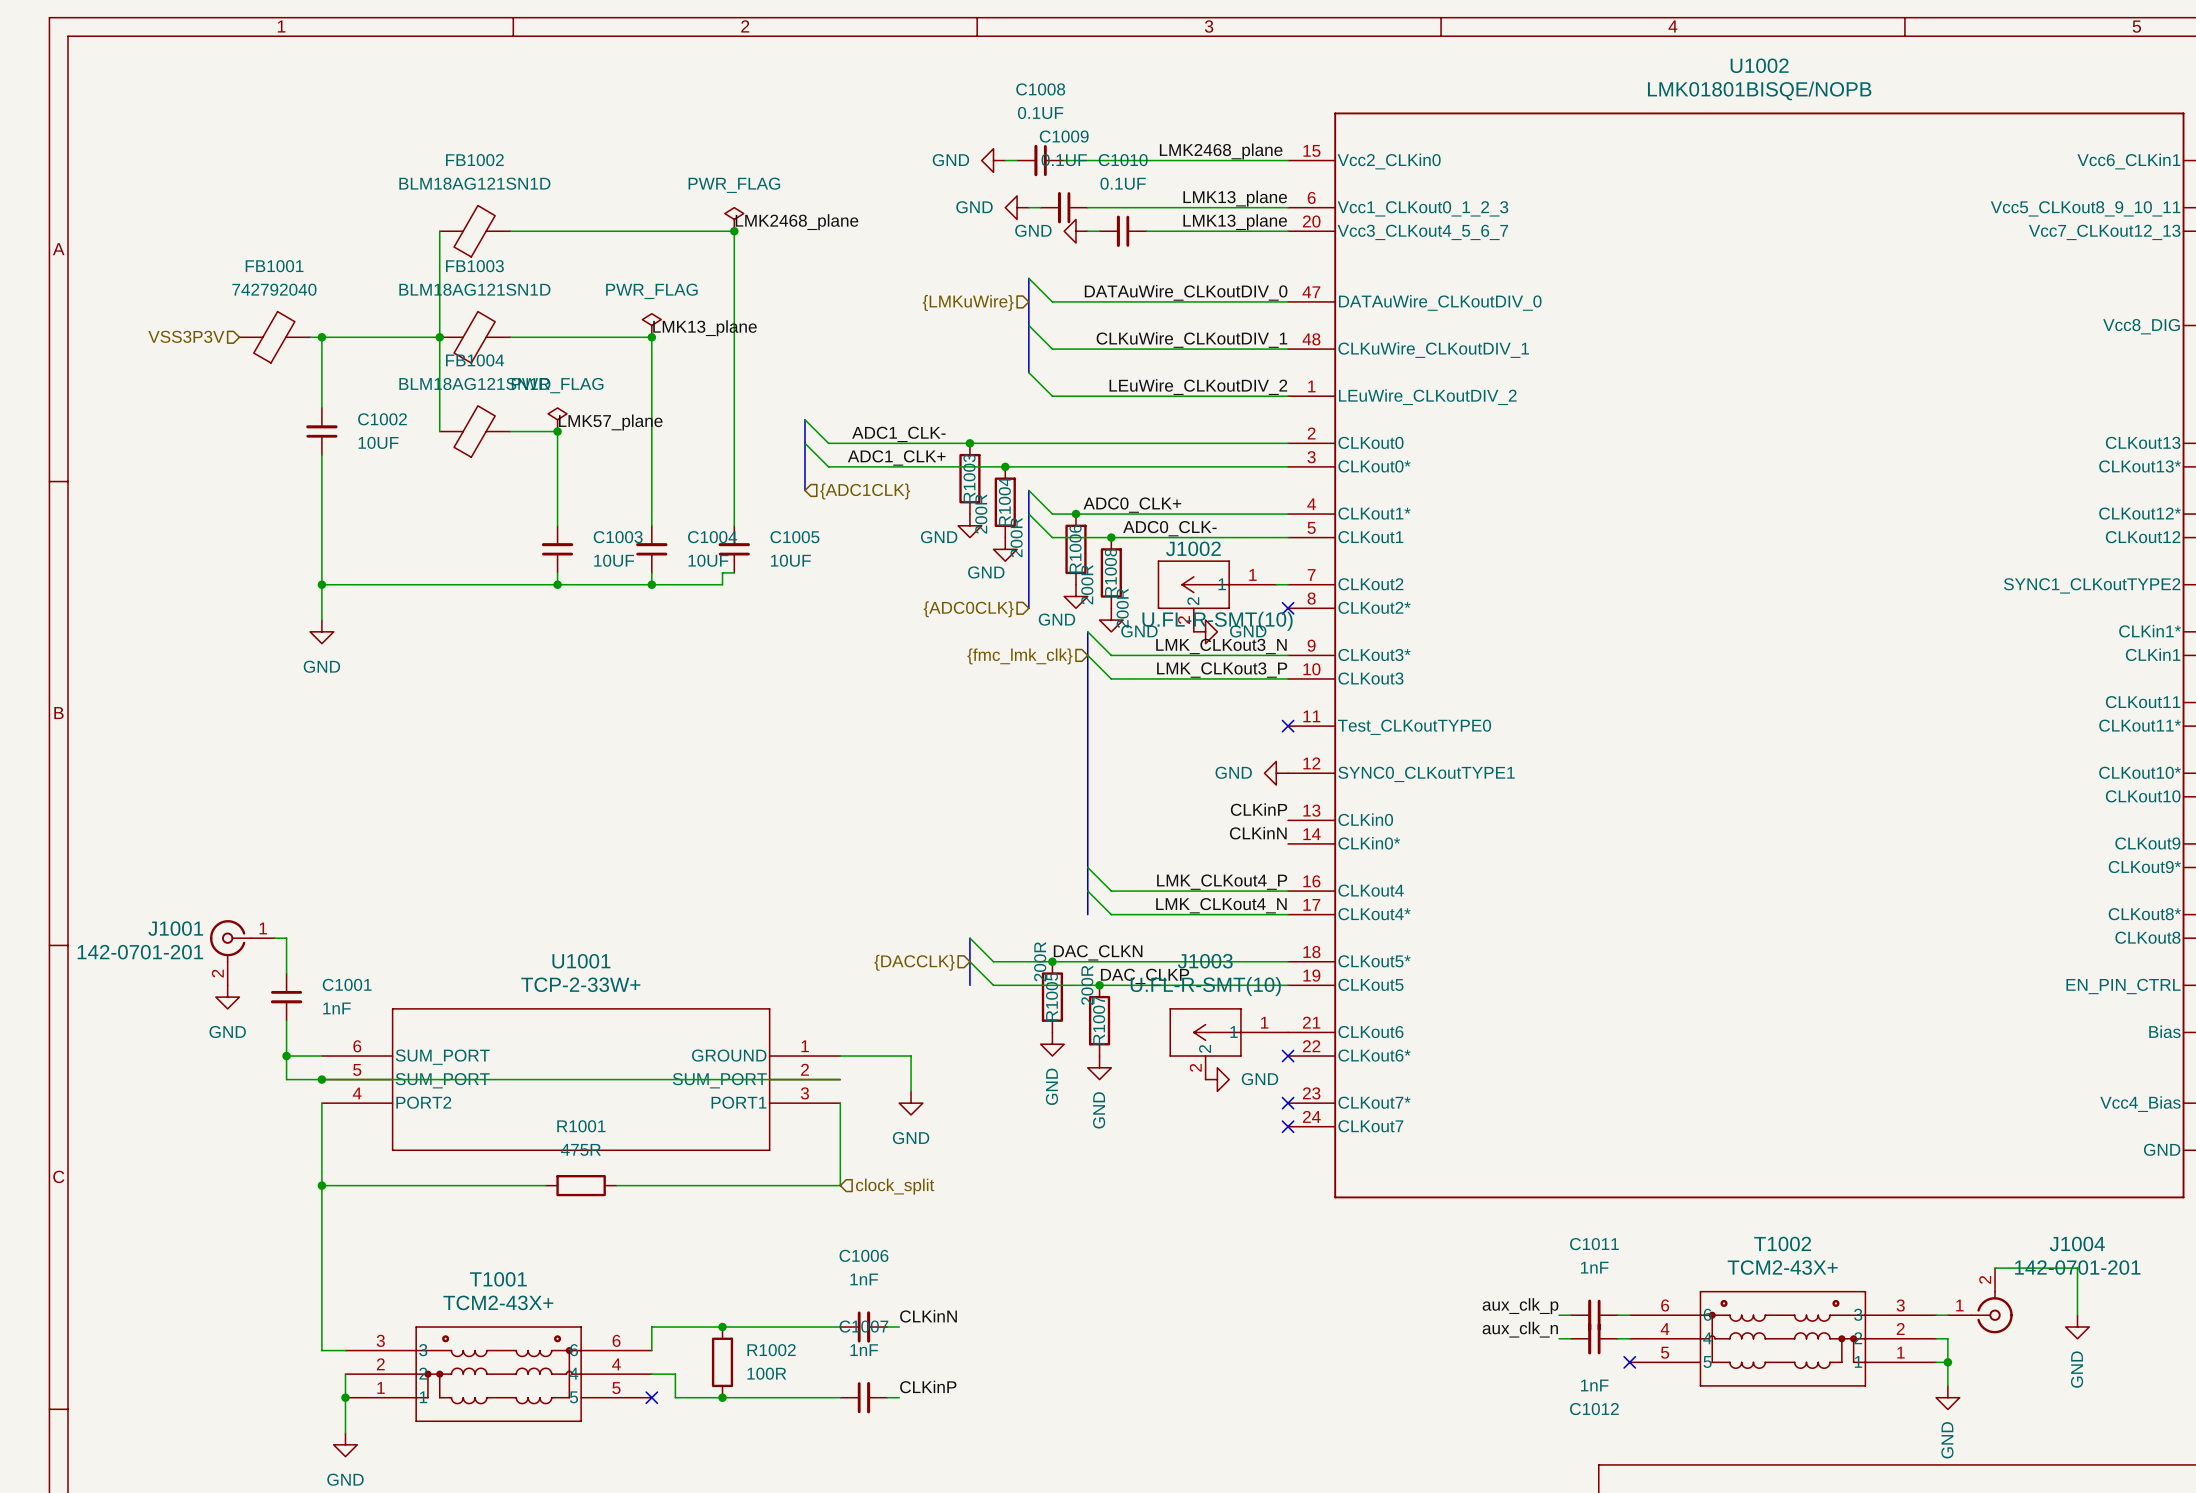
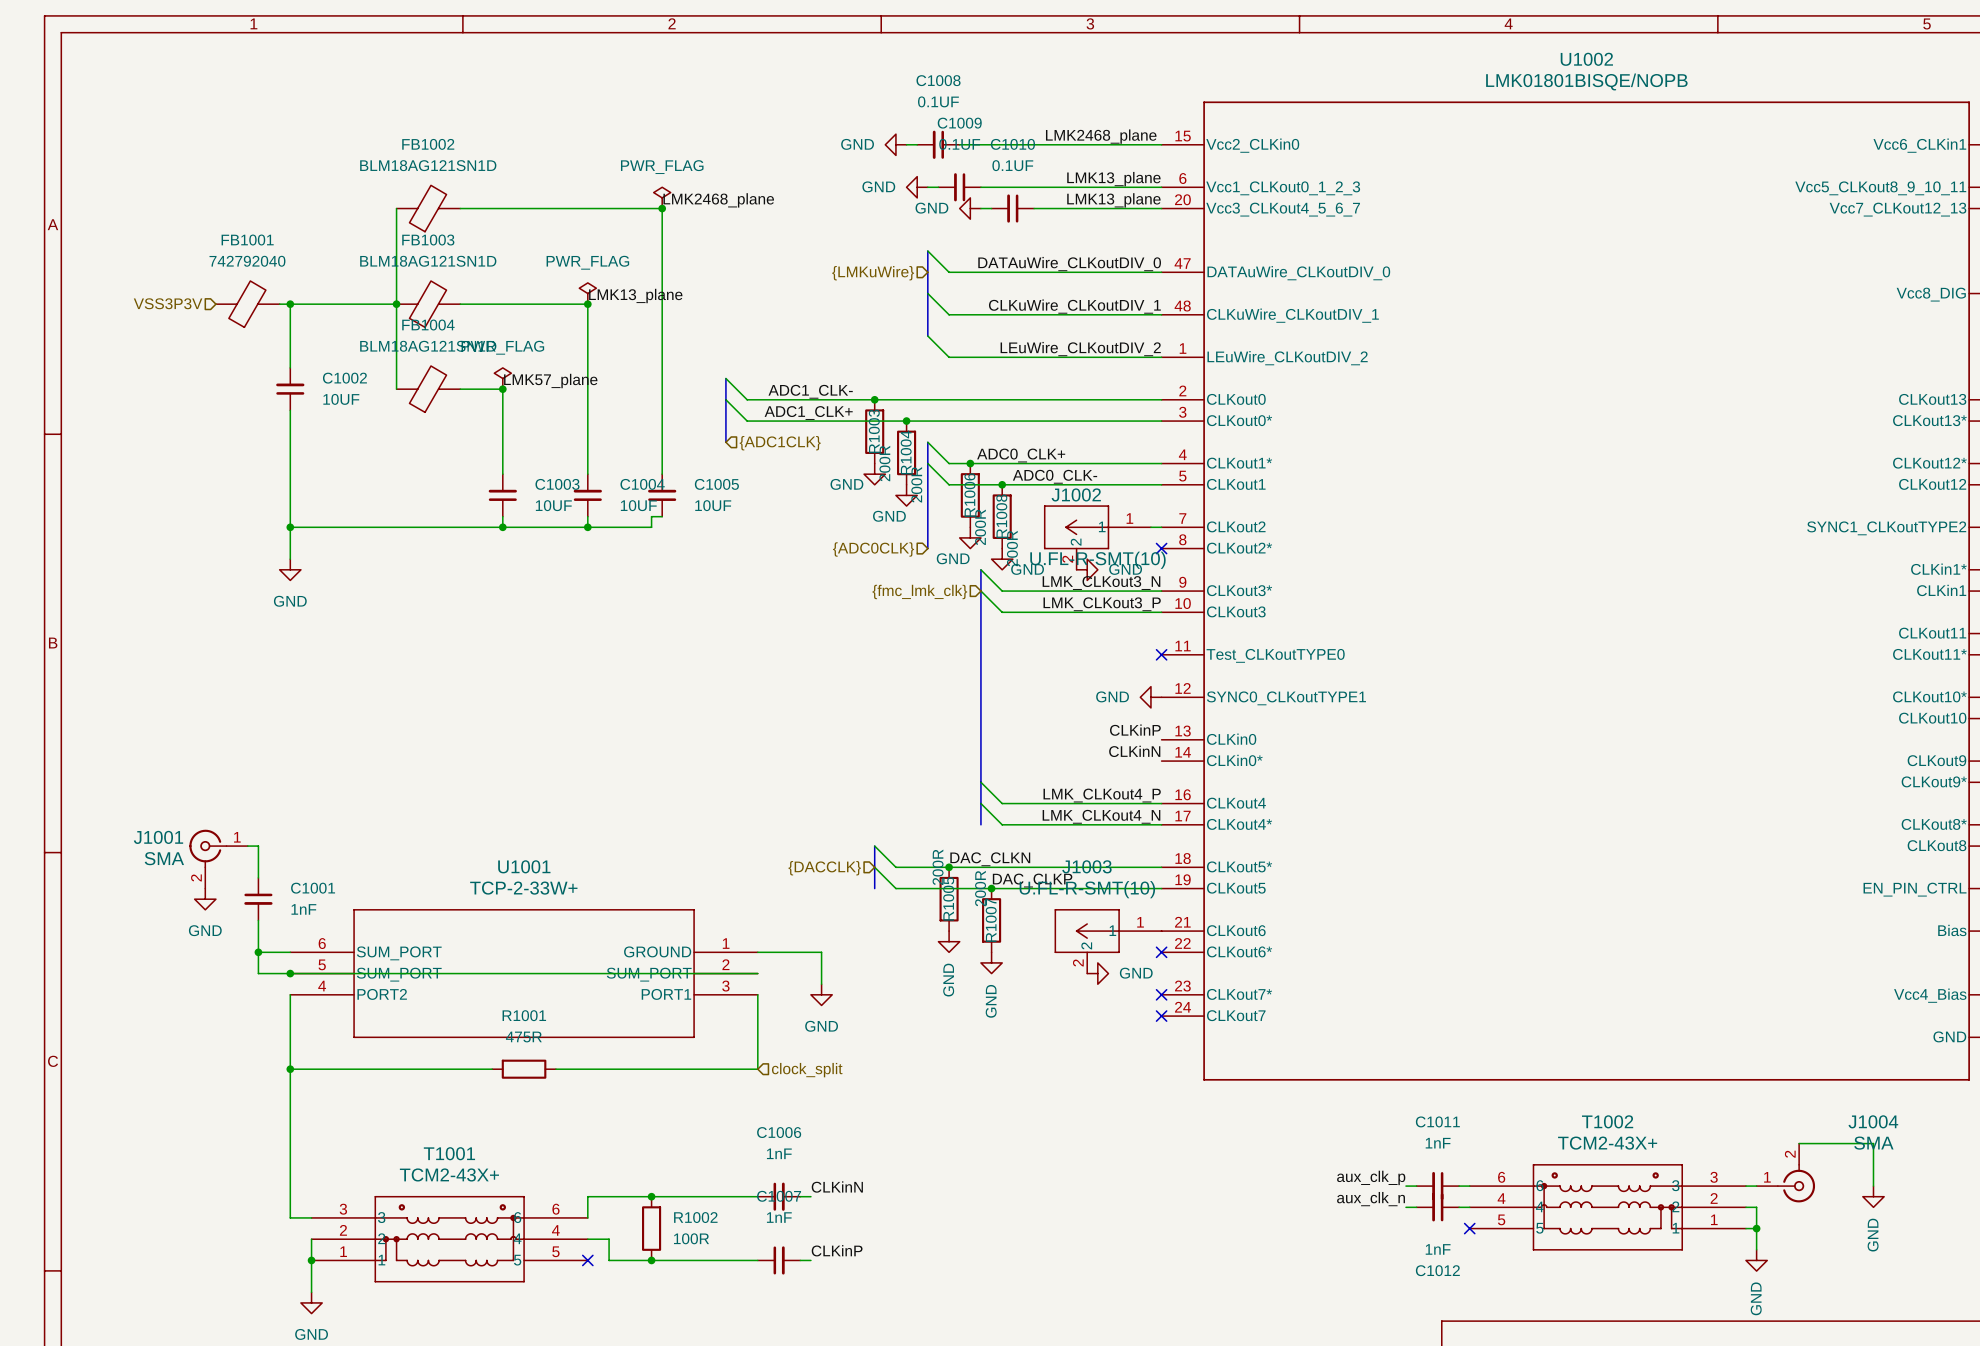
J1001 value: 142-0701-201 (140, 952) -> SMA (164, 858)
J1004 value: 142-0701-201 (2077, 1267) -> SMA (1873, 1143)

